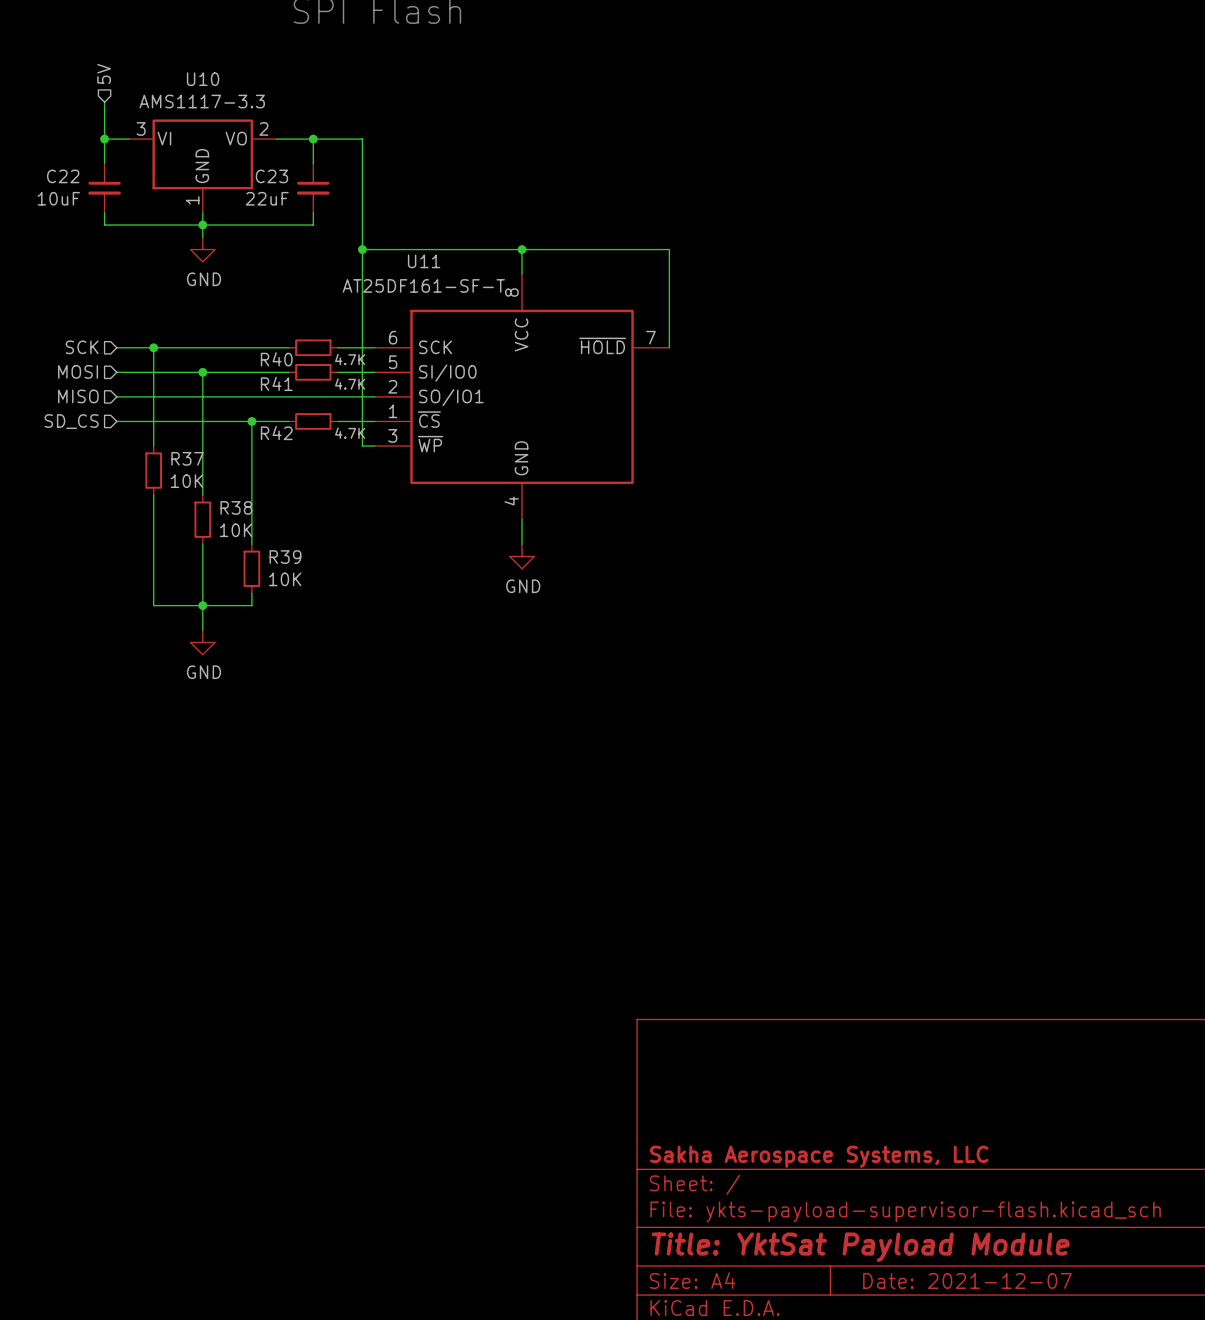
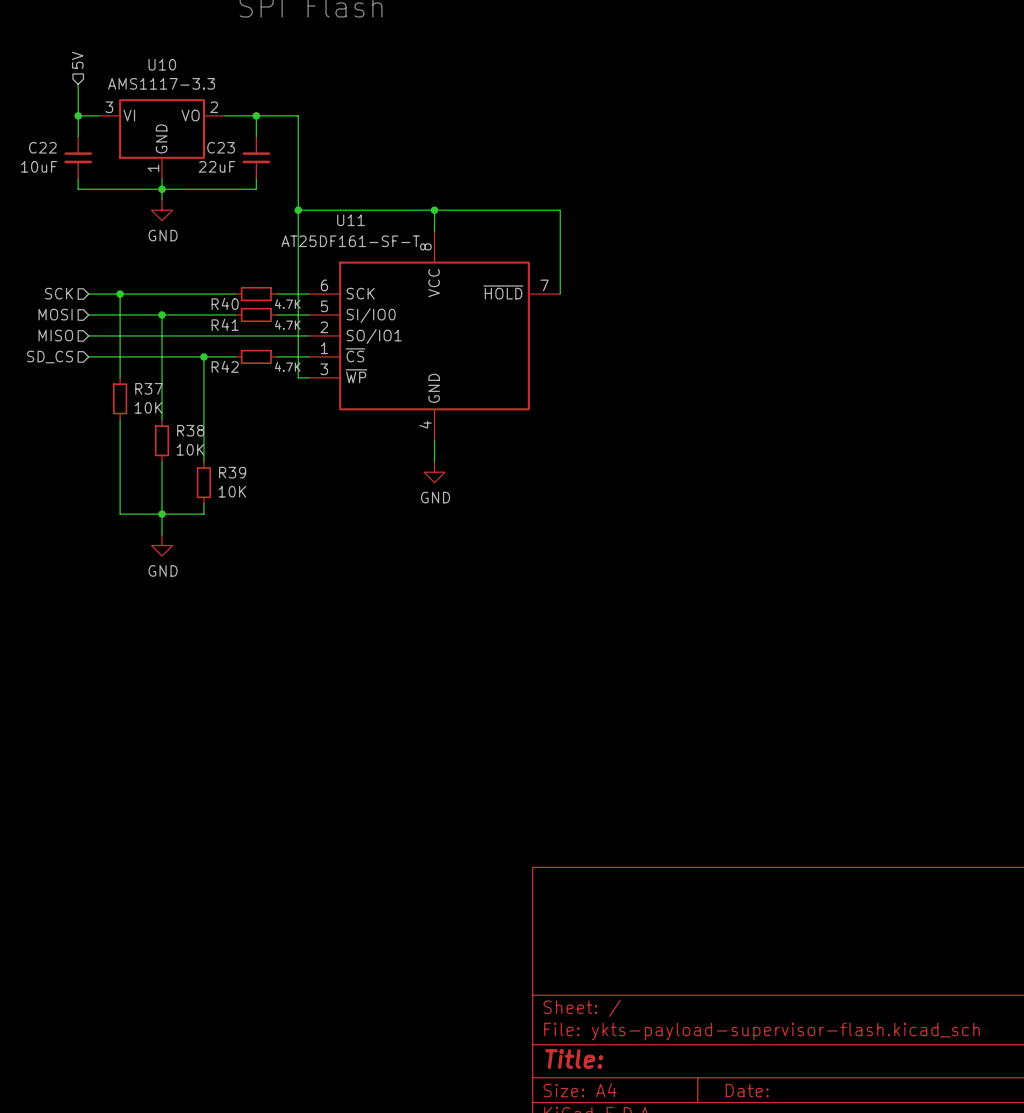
title block: Sakha Aerospace Systems, LLC (819, 1156) -> none
title block: Title: YktSat Payload Module (860, 1247) -> Title: (574, 1059)
title block: Date: 2021-12-07 (967, 1280) -> Date: (747, 1090)

